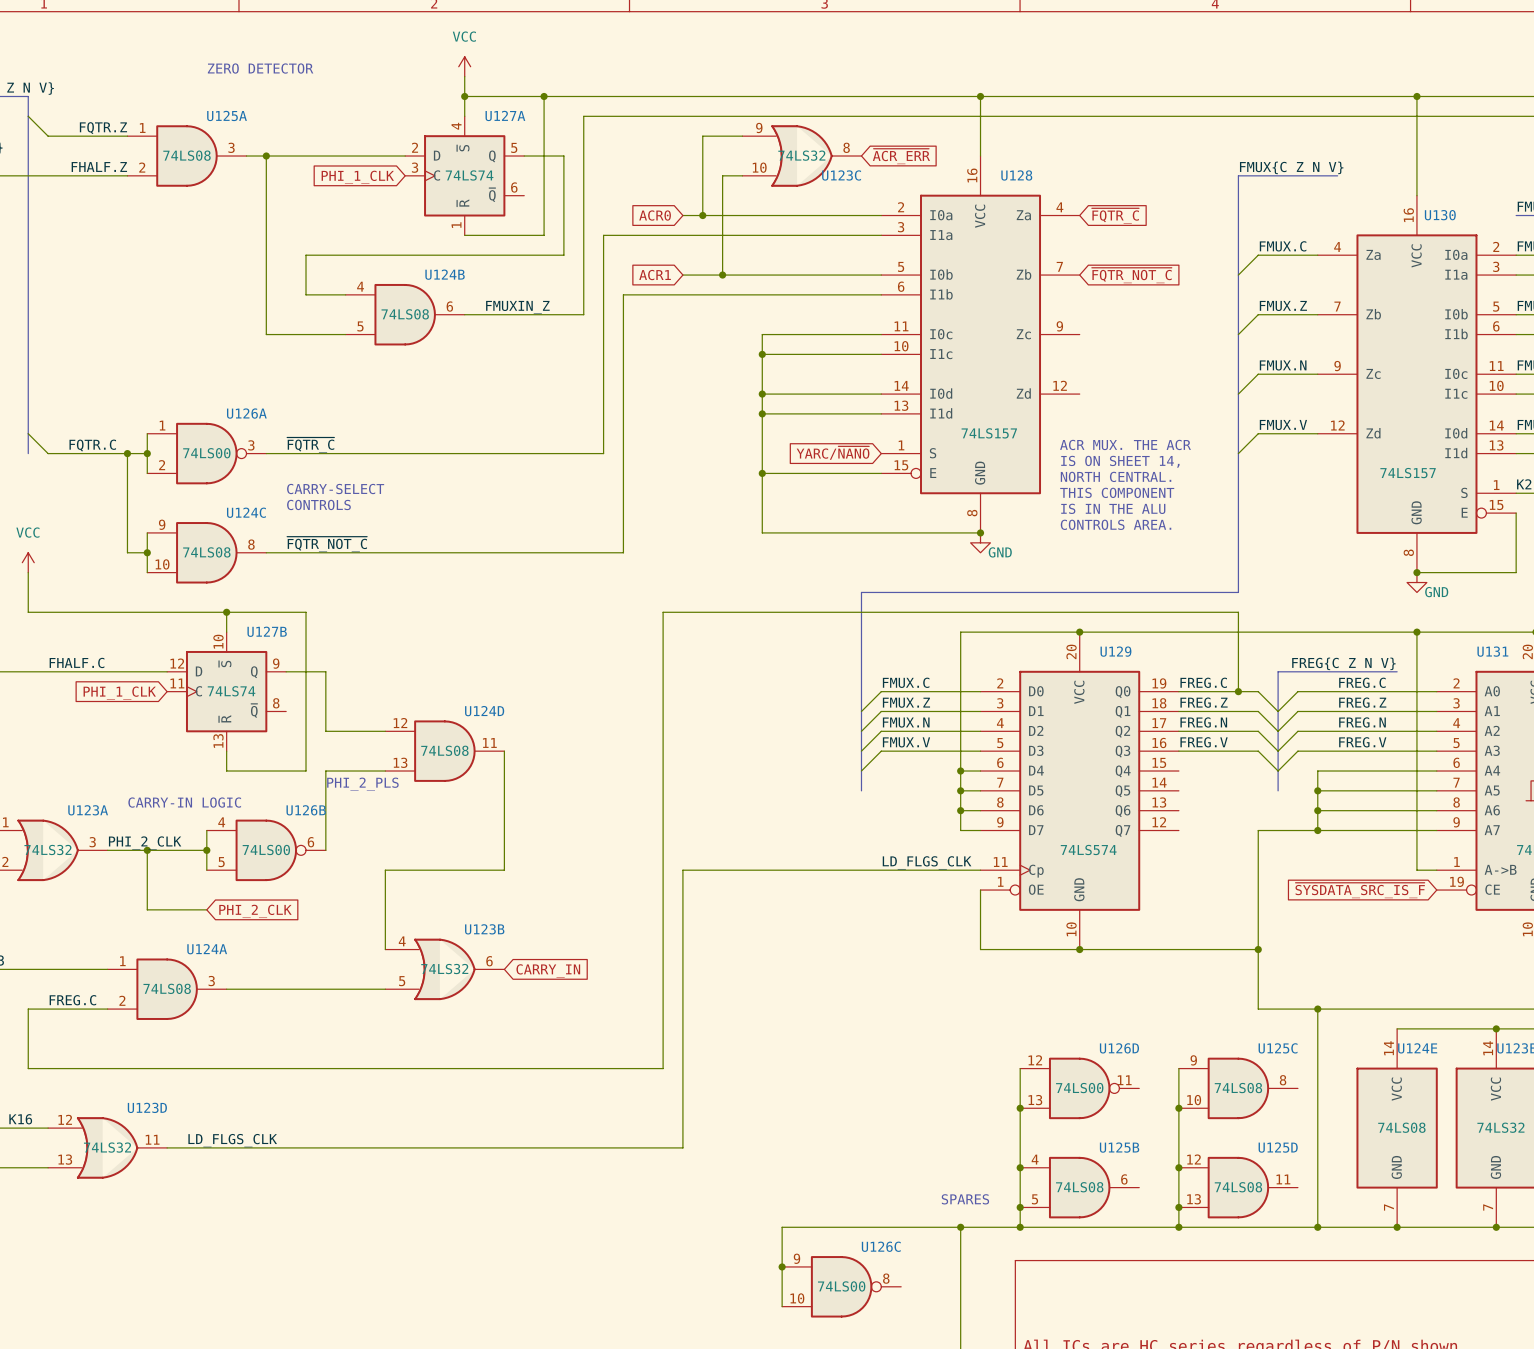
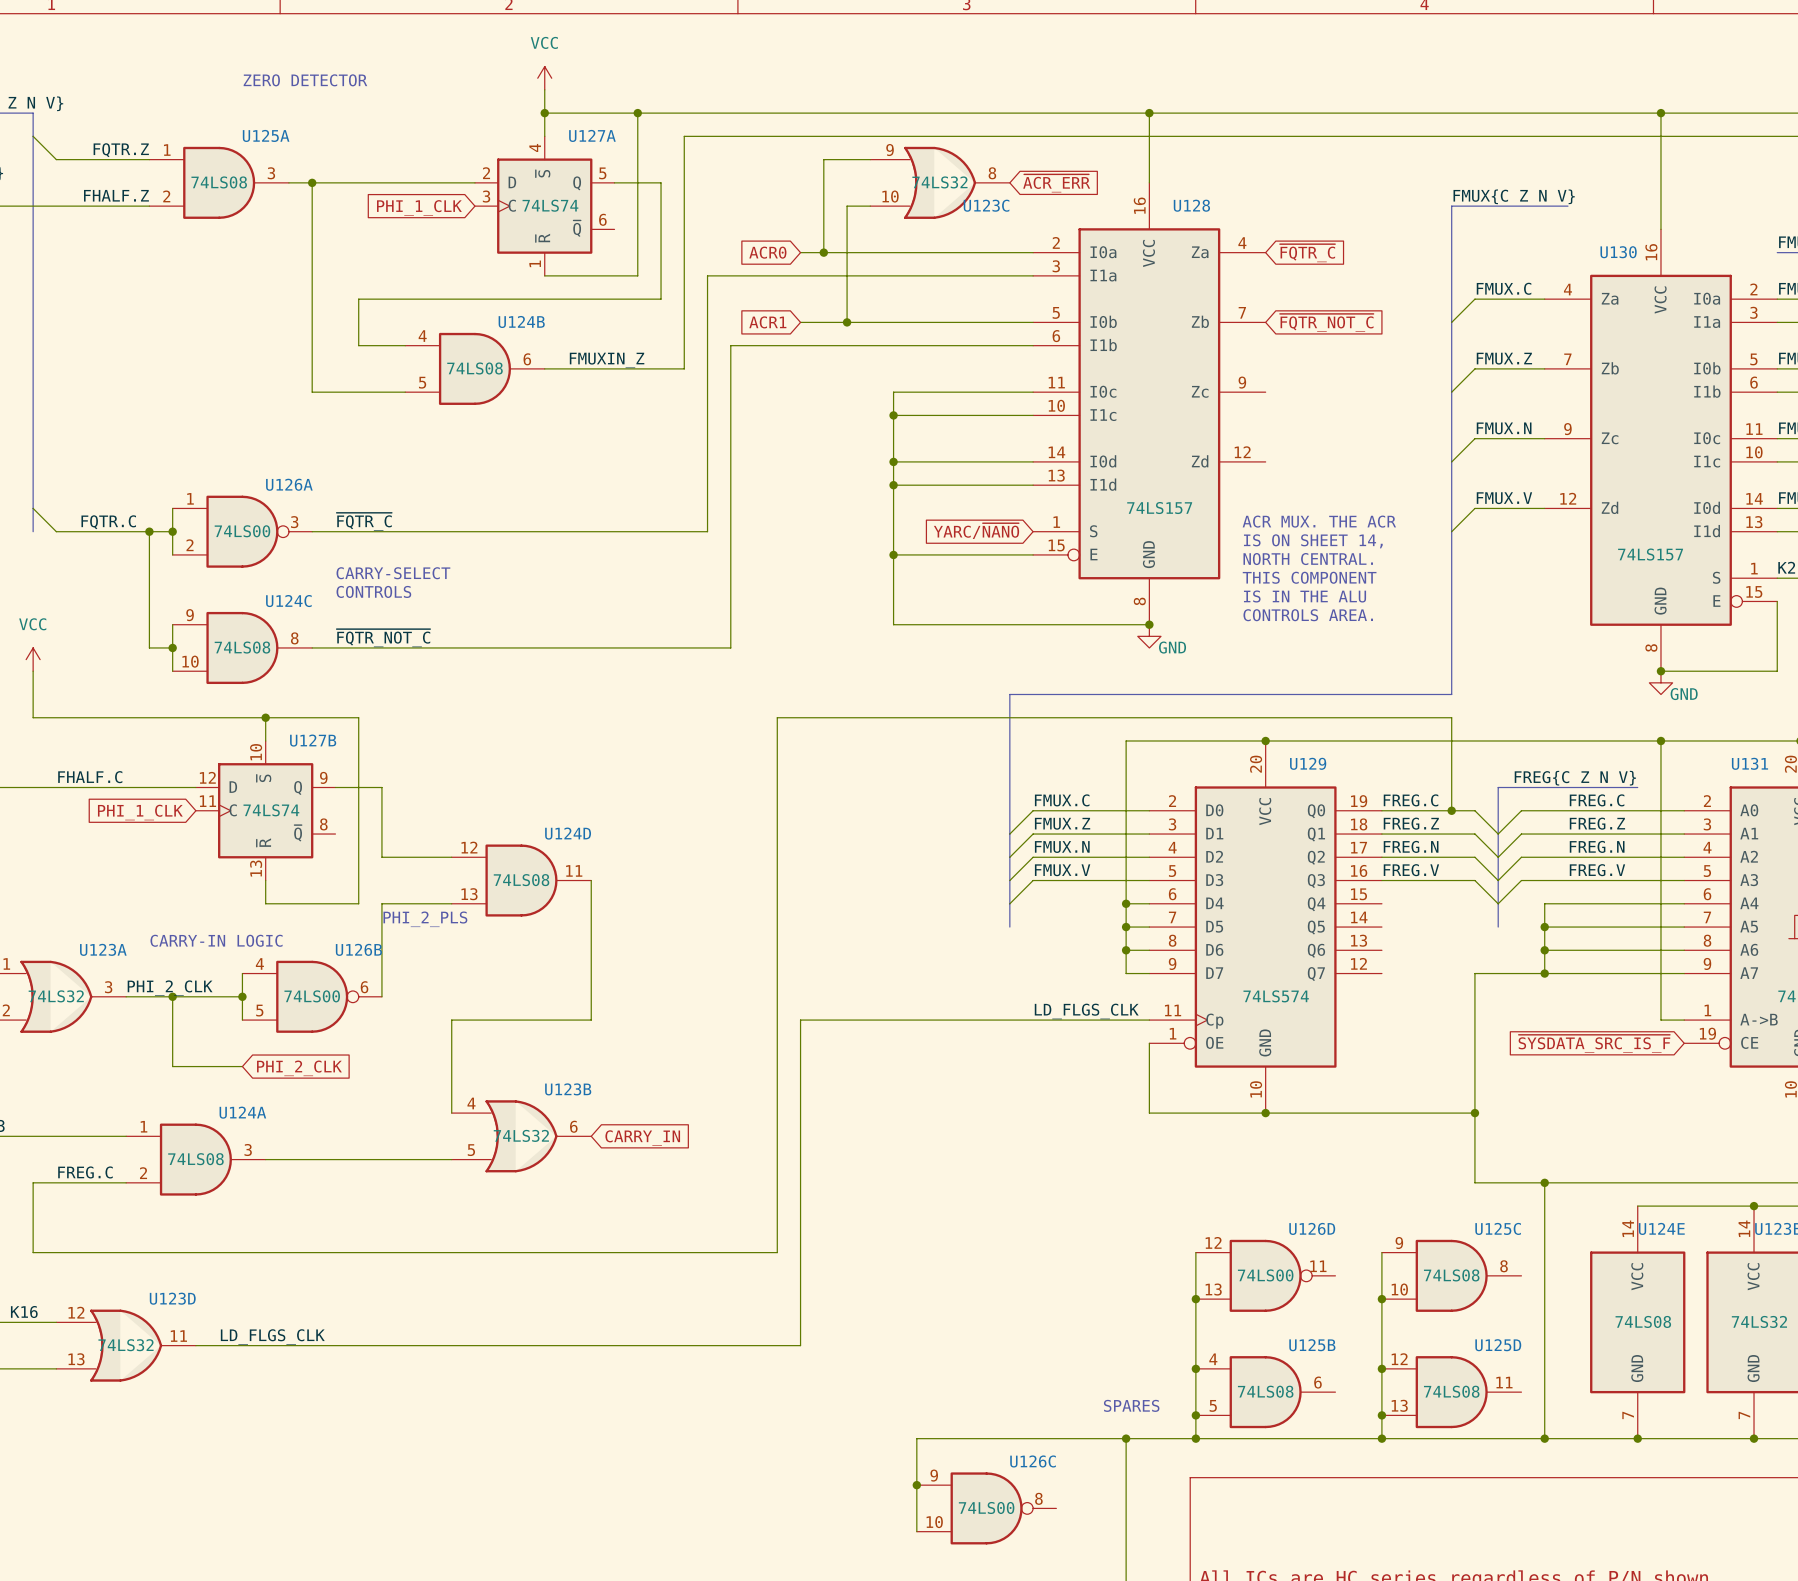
U130 name position: U130 (1440, 215) -> U130 (1618, 252)

